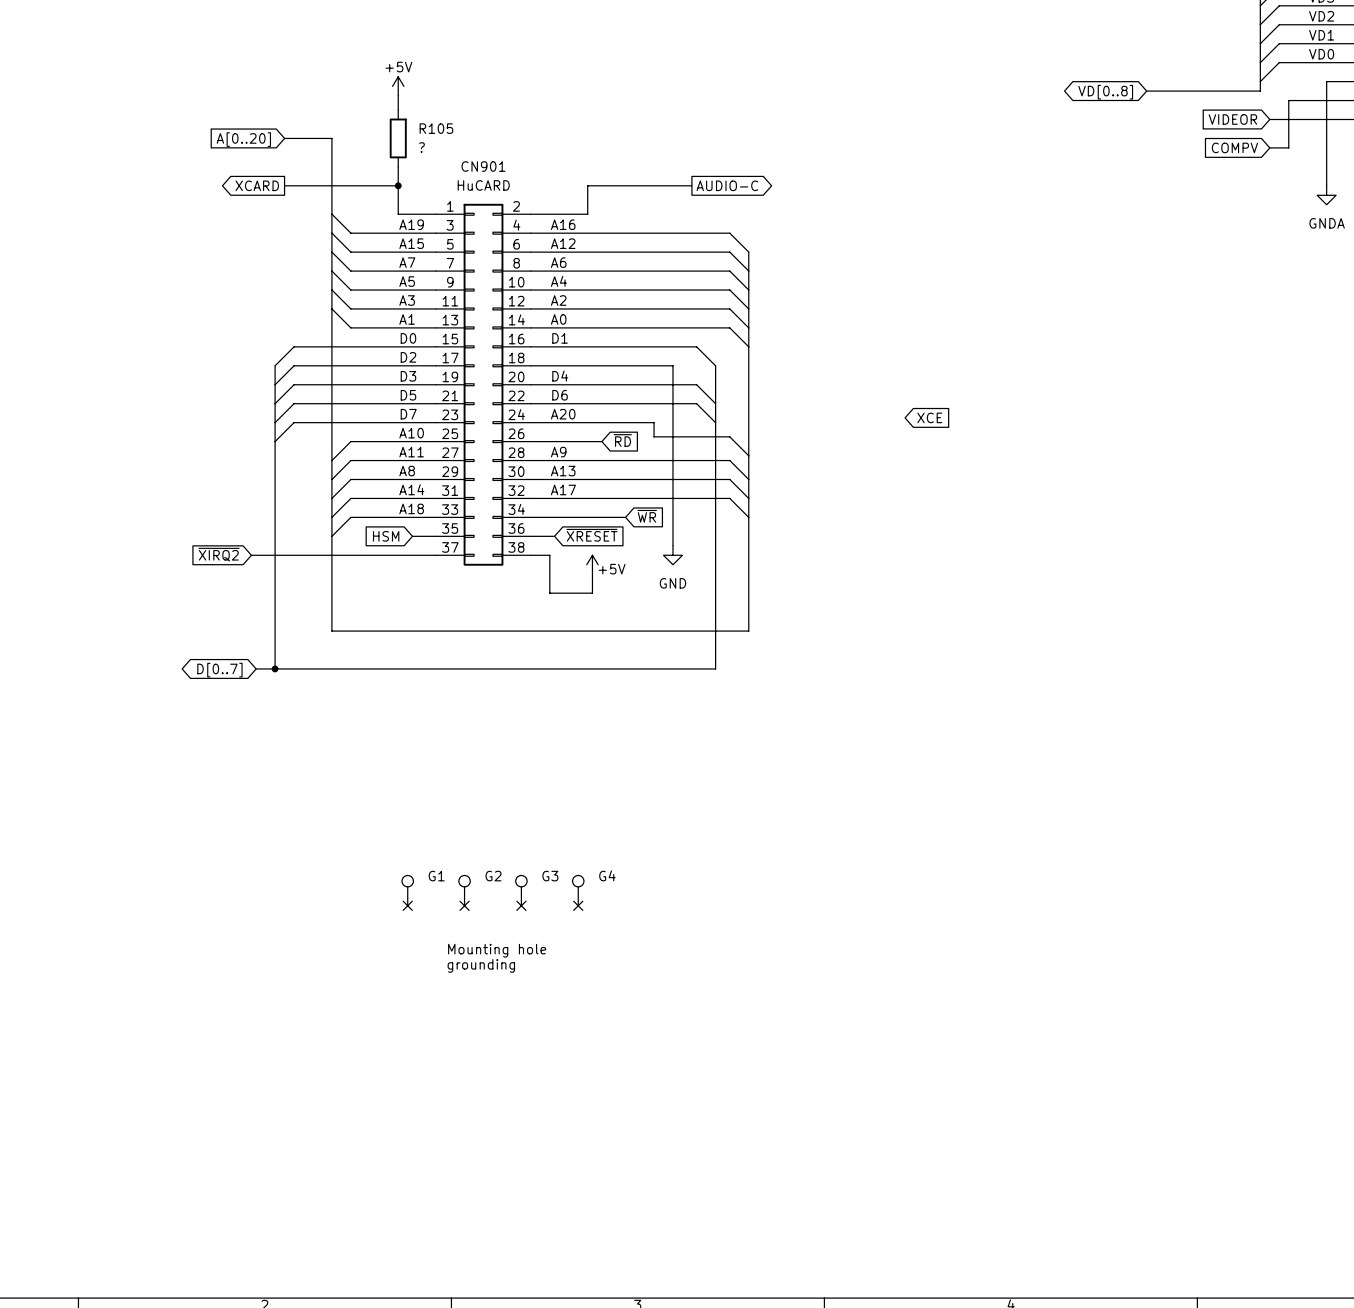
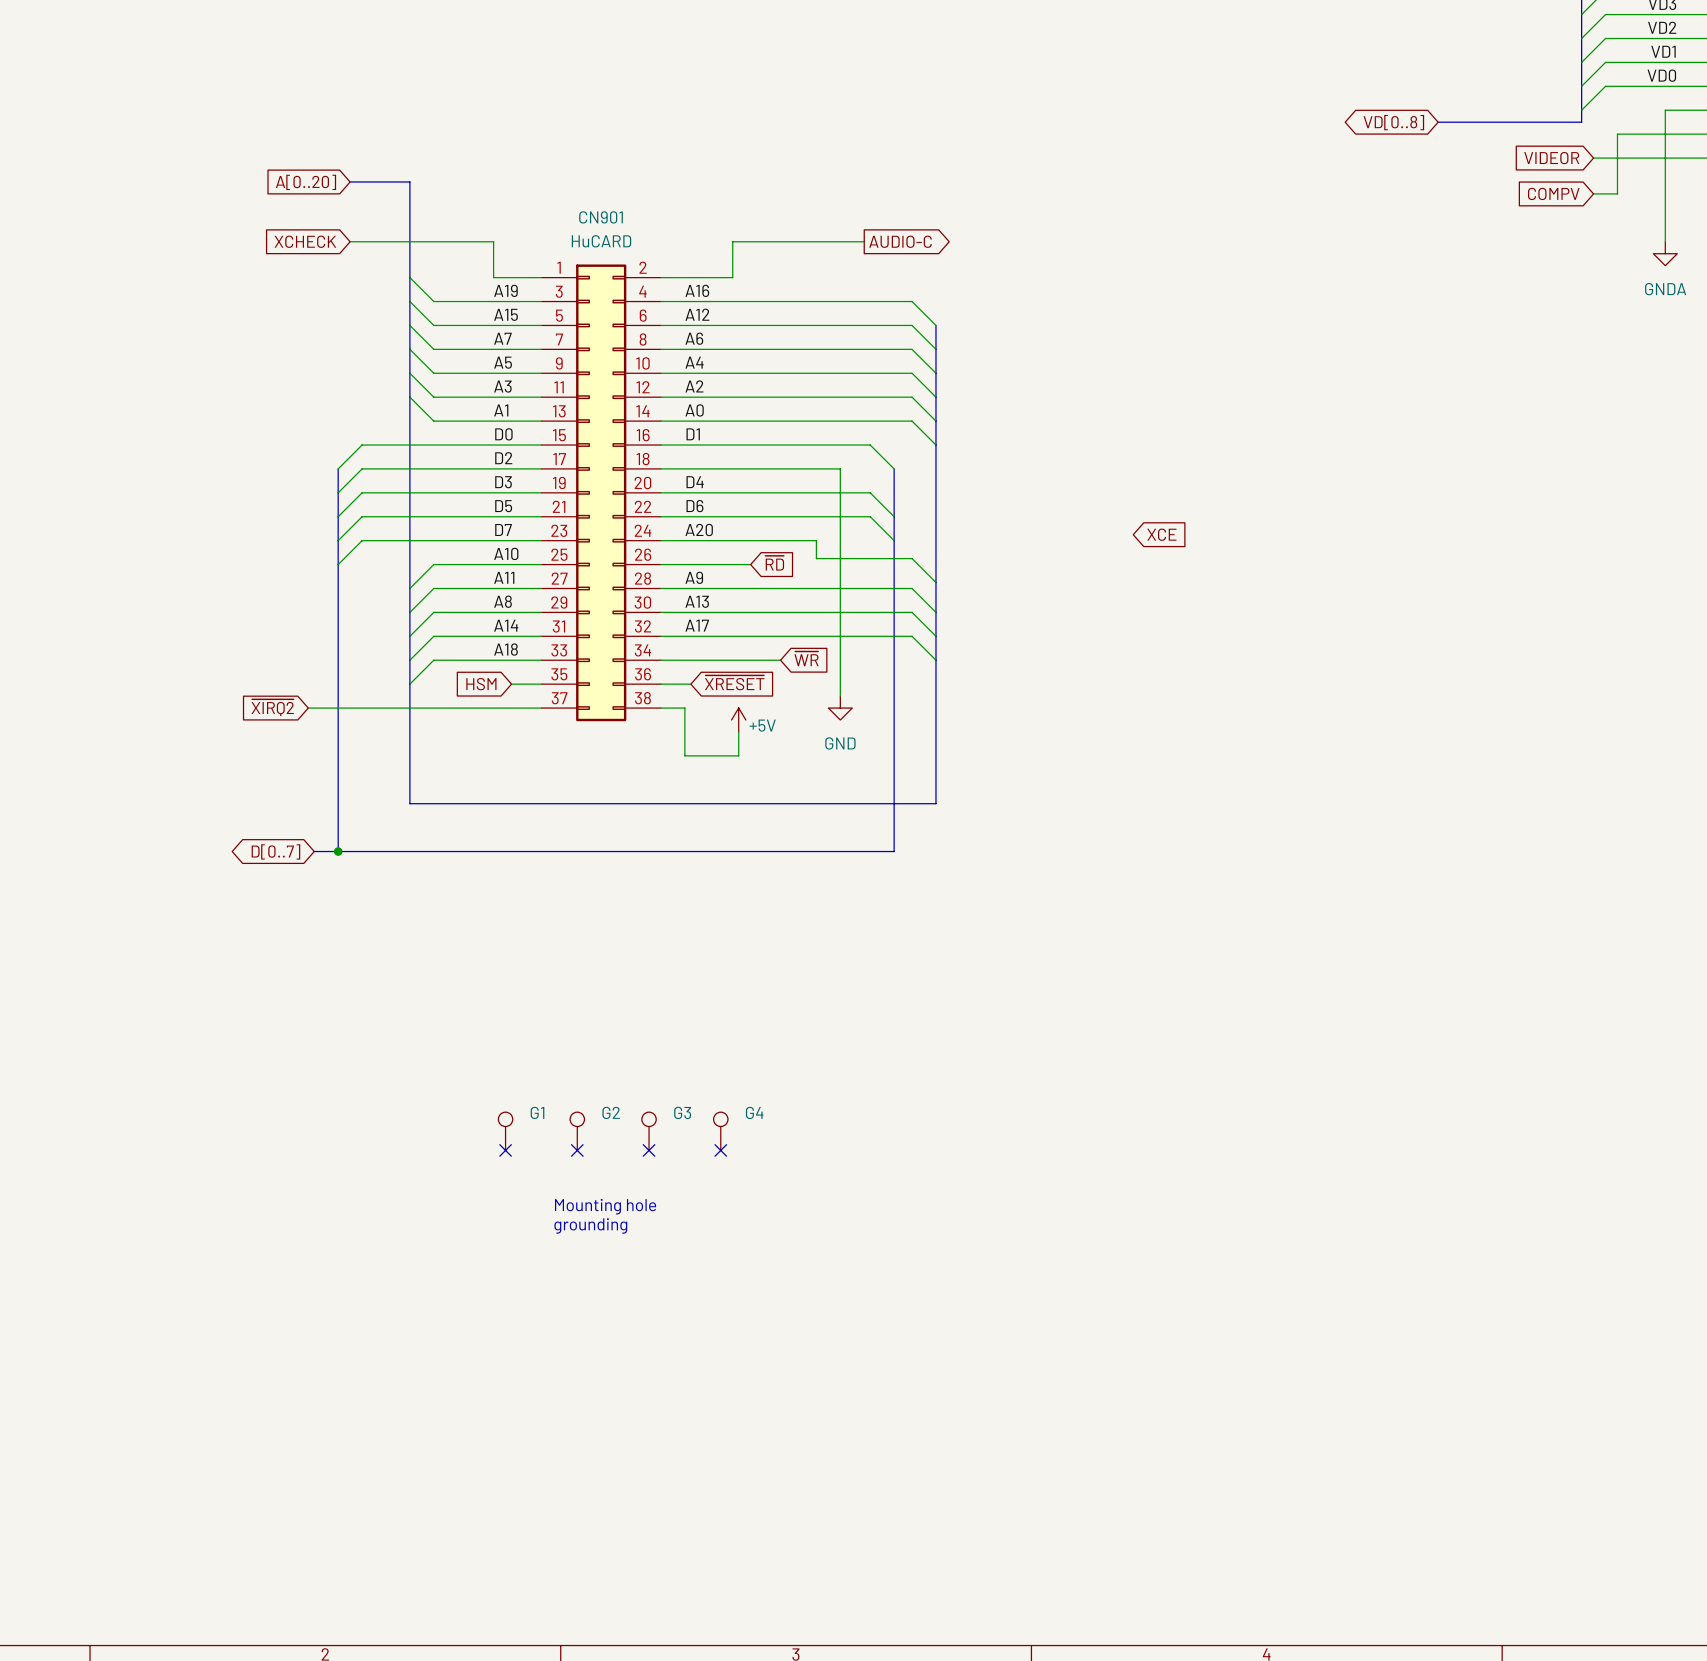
power symbol: +5V (398, 86) -> none
wire: (398, 95) (398, 110) -> none
R105: ? (398, 138) -> none
wire: (398, 166) (398, 185) -> none
global label shape: output (257, 185) -> input (305, 241)
global label: XCARD (257, 185) -> XCHECK (305, 241)
junction: (398, 185) -> none

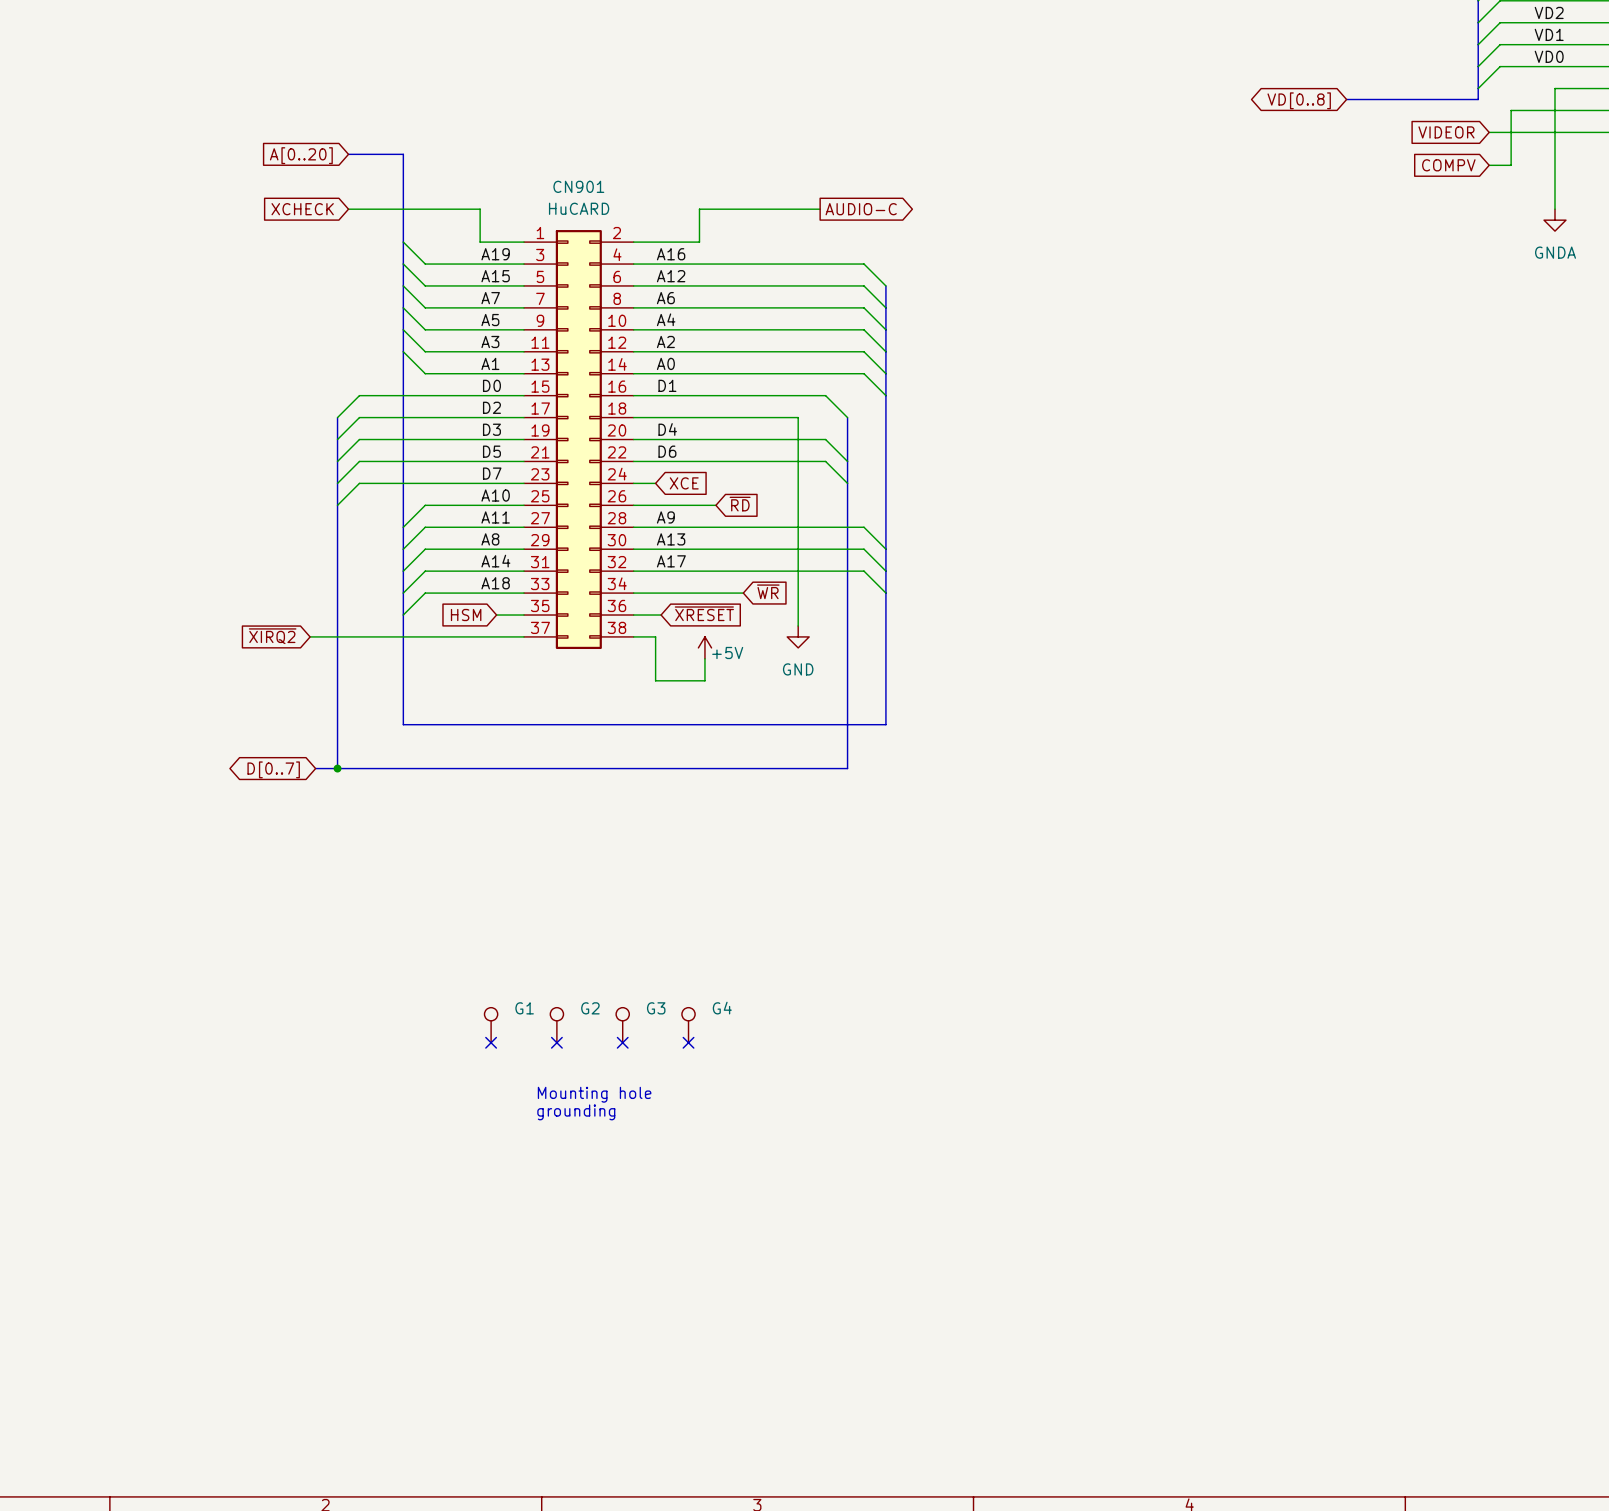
label: A20 (699, 530) -> none
global label: XCE (1161, 534) -> none
wire: (684, 540) (816, 540) (816, 558) (912, 558) -> none
global label: none -> XCE (684, 483)
wire: (912, 558) (935, 582) -> none

